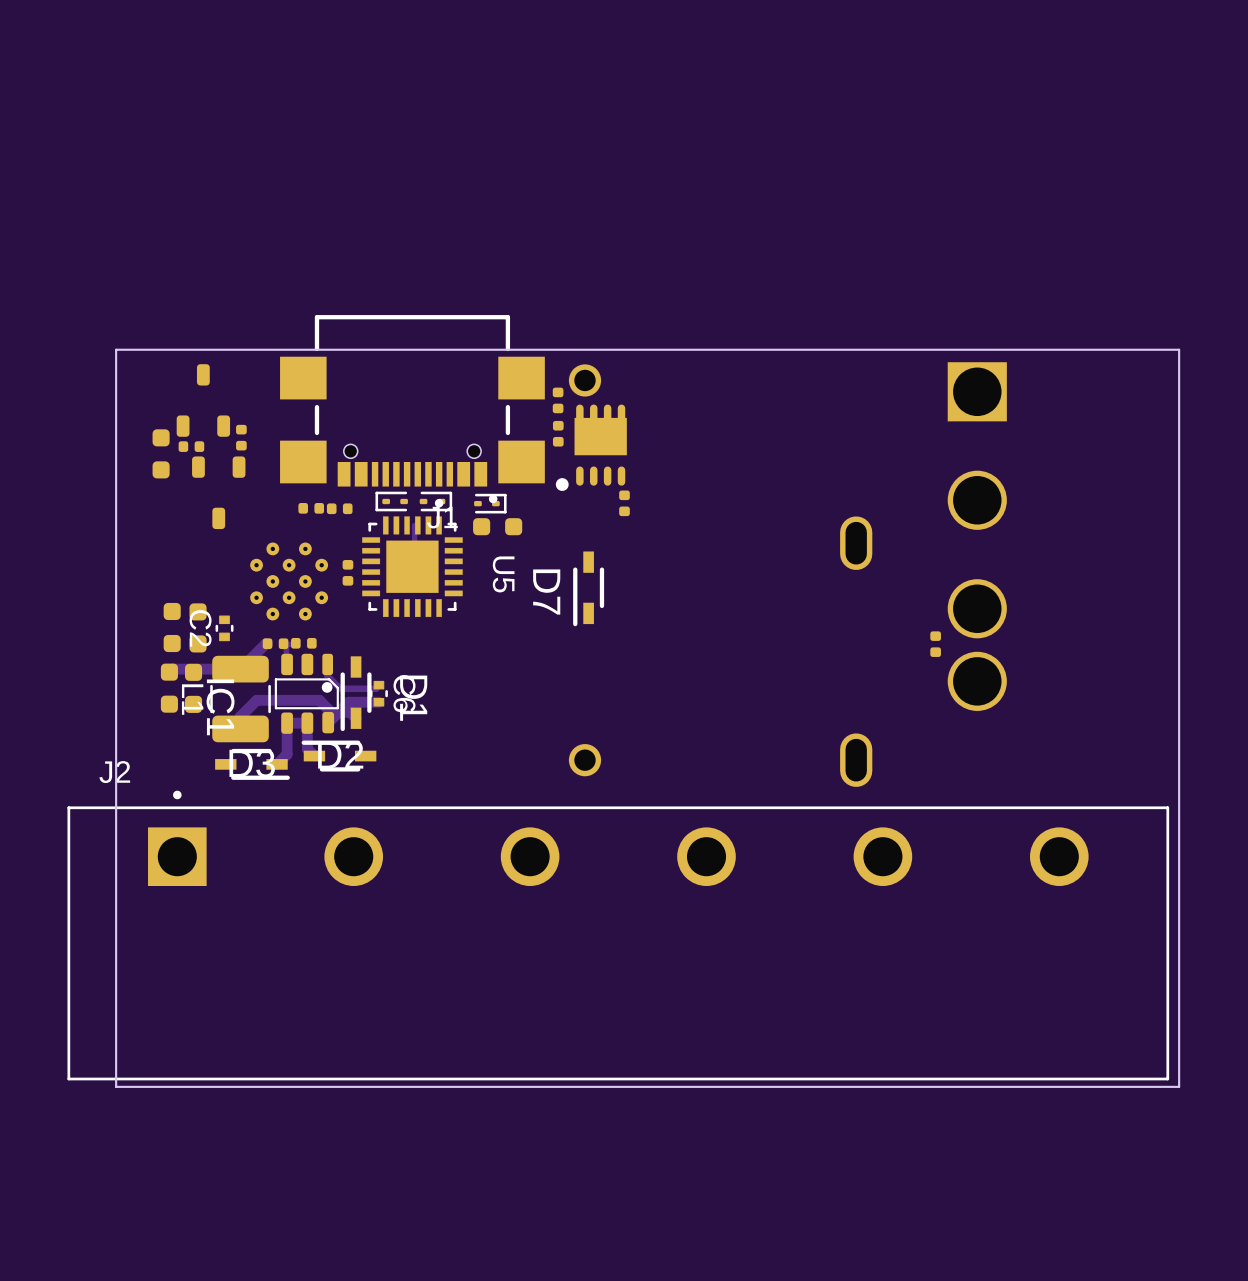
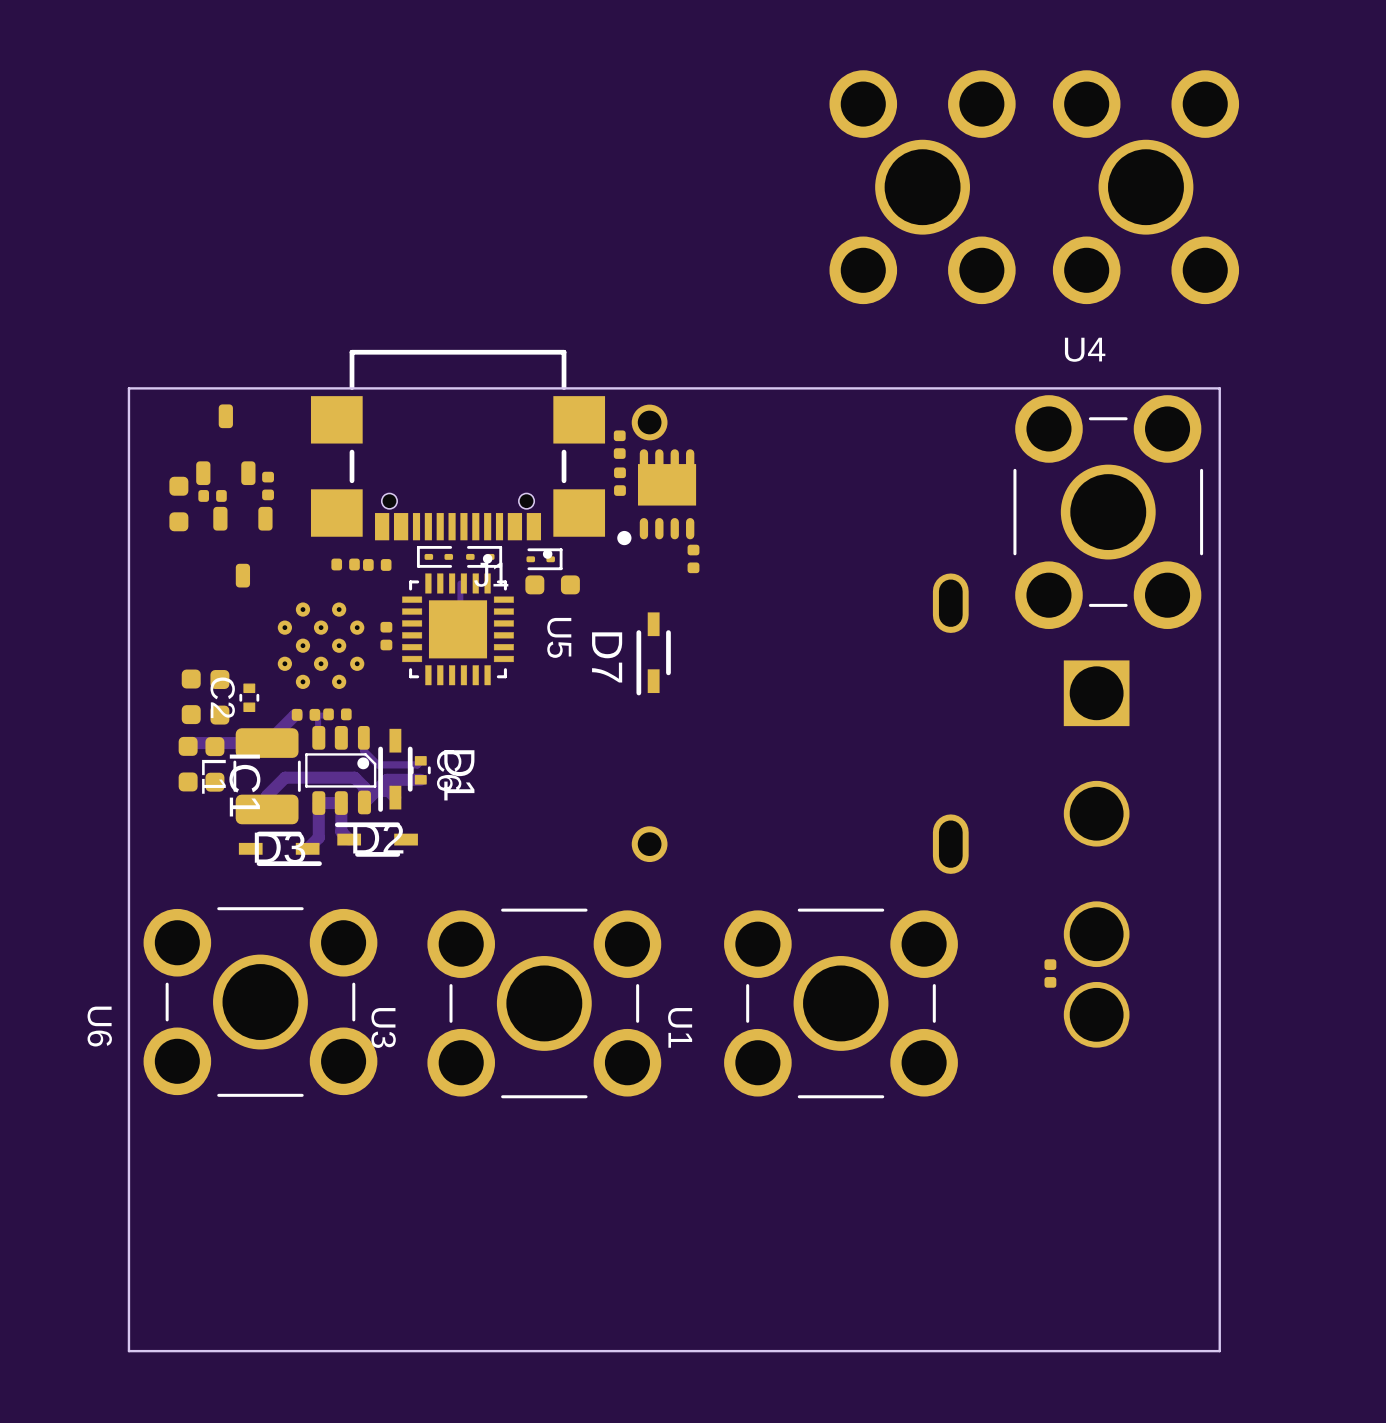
part: none -> (922, 187)
part: none -> (1145, 187)
board edge: (1098, 349) (1179, 349) (1179, 1086) (116, 1086) -> (1219, 388) (1219, 1351) (128, 1351) (128, 1206)
U4: none -> (1108, 512)
part position: (977, 536) -> (1096, 854)
part position: (935, 644) -> (1050, 973)
U6: none -> (260, 1002)
U3: none -> (544, 1003)
U1: none -> (841, 1003)
J2: (618, 935) -> none

